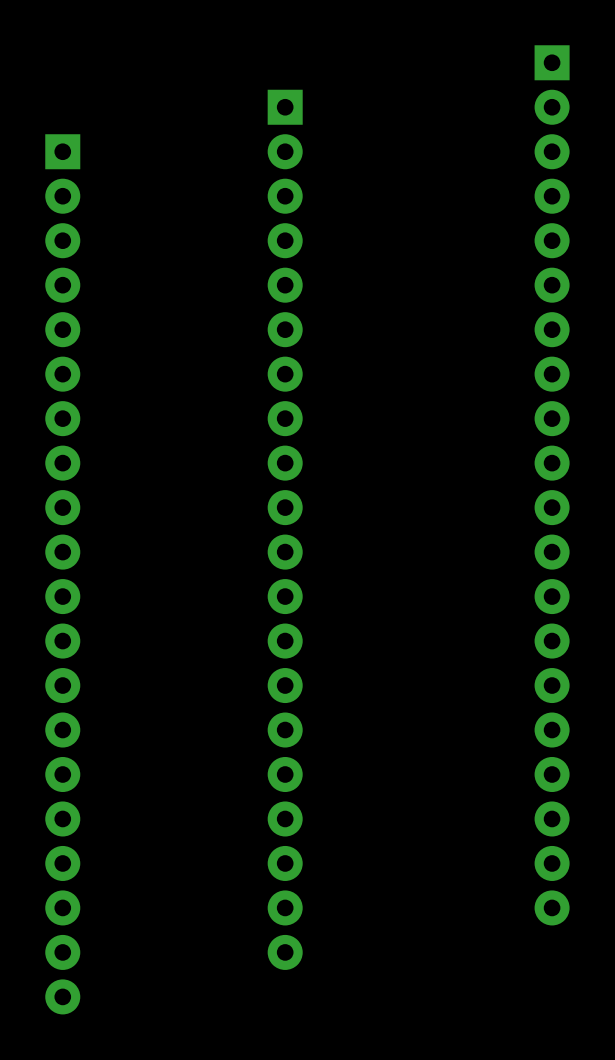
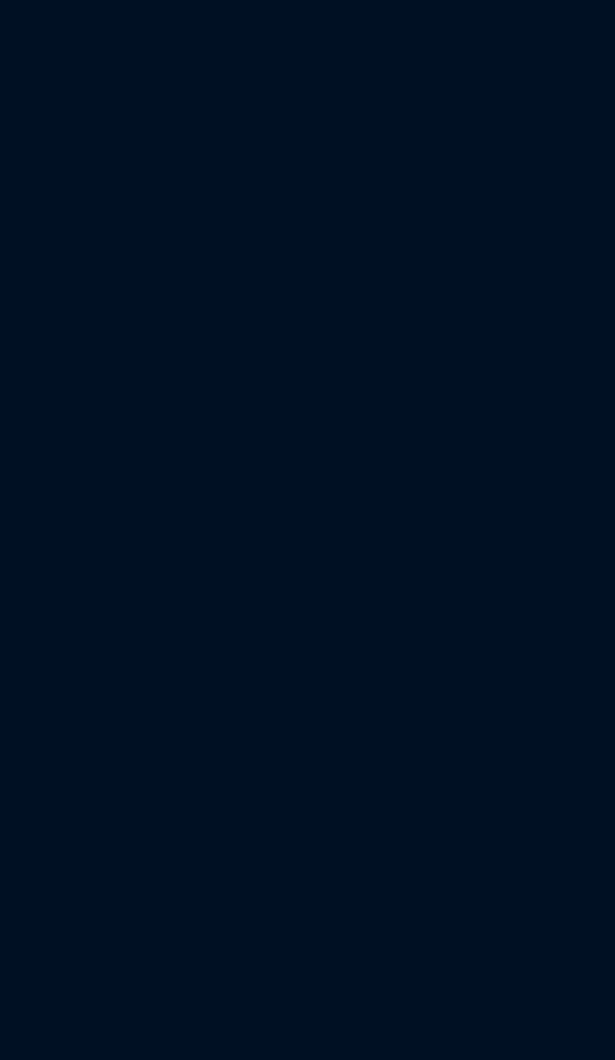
part: (552, 485) -> none
part: (285, 529) -> none
part: (62, 574) -> none

